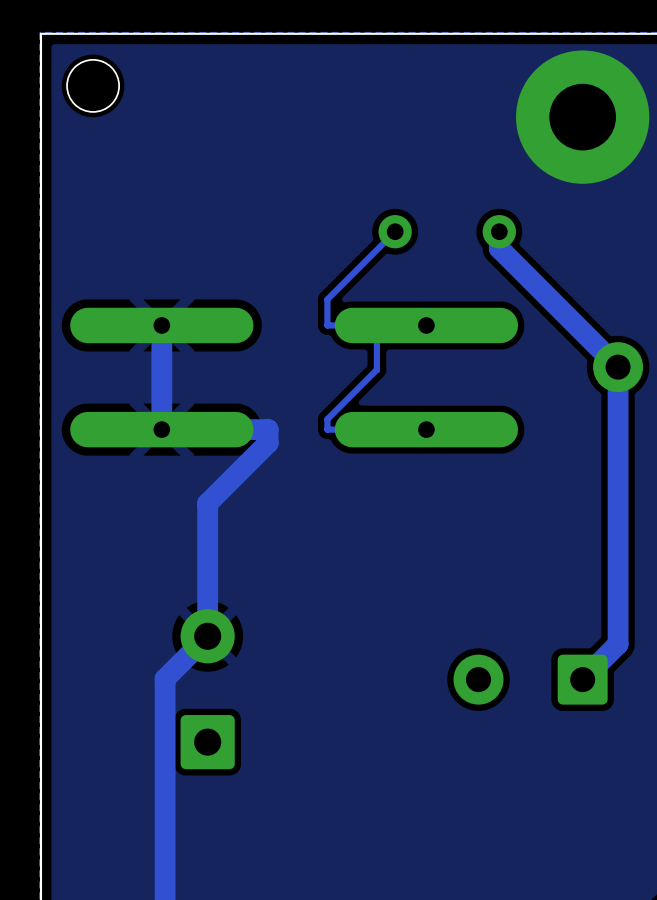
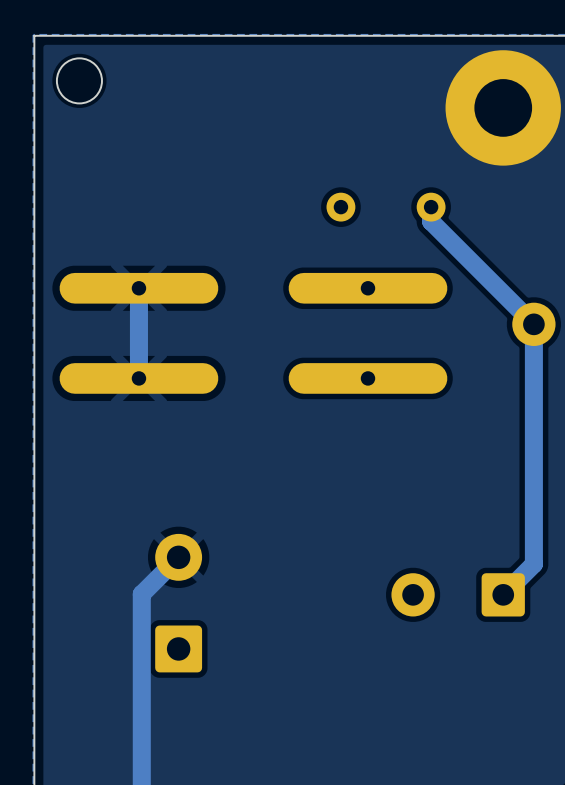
track: (395, 231) (327, 299) (327, 325) (426, 325) -> none
track: (376, 325) (376, 369) (327, 419) (327, 429) (426, 429) -> none
track: (161, 429) (268, 429) (268, 443) (207, 503) (207, 636) -> none

